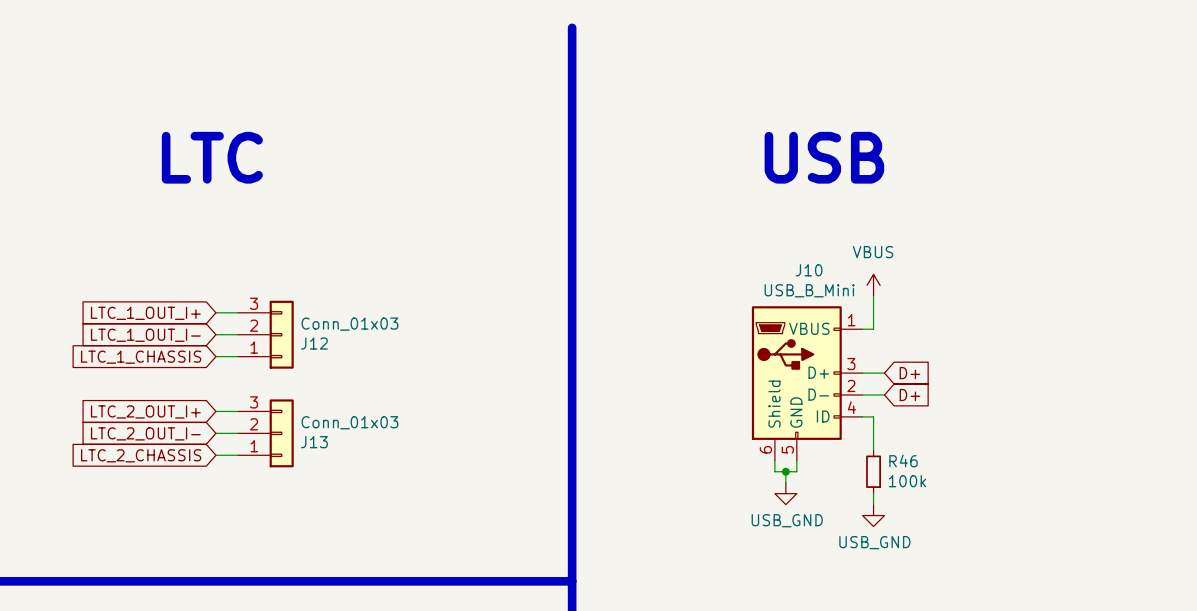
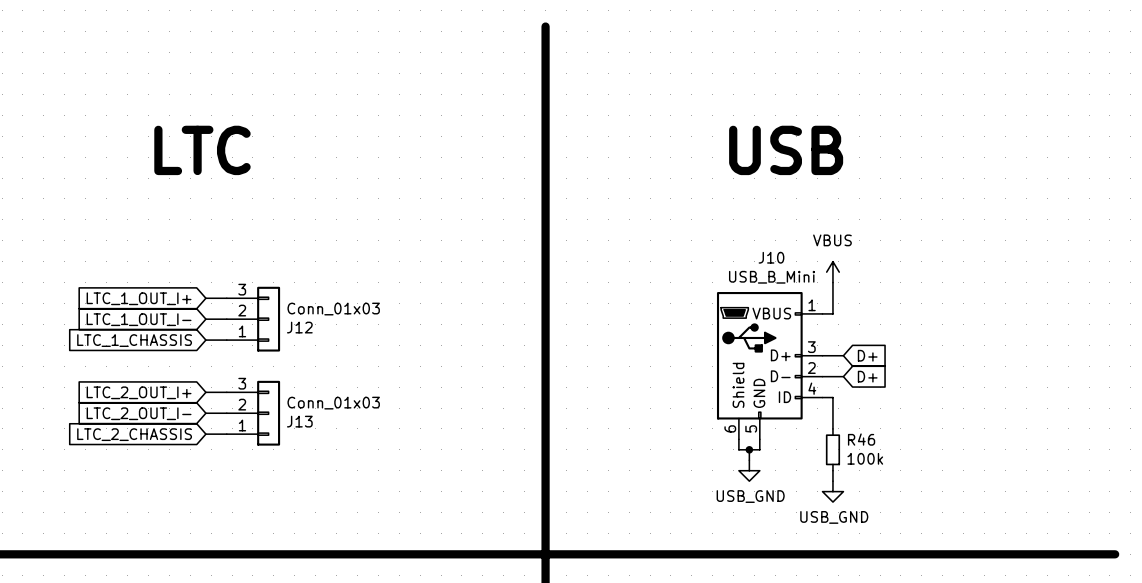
line: none -> (545, 554) (1115, 554)

